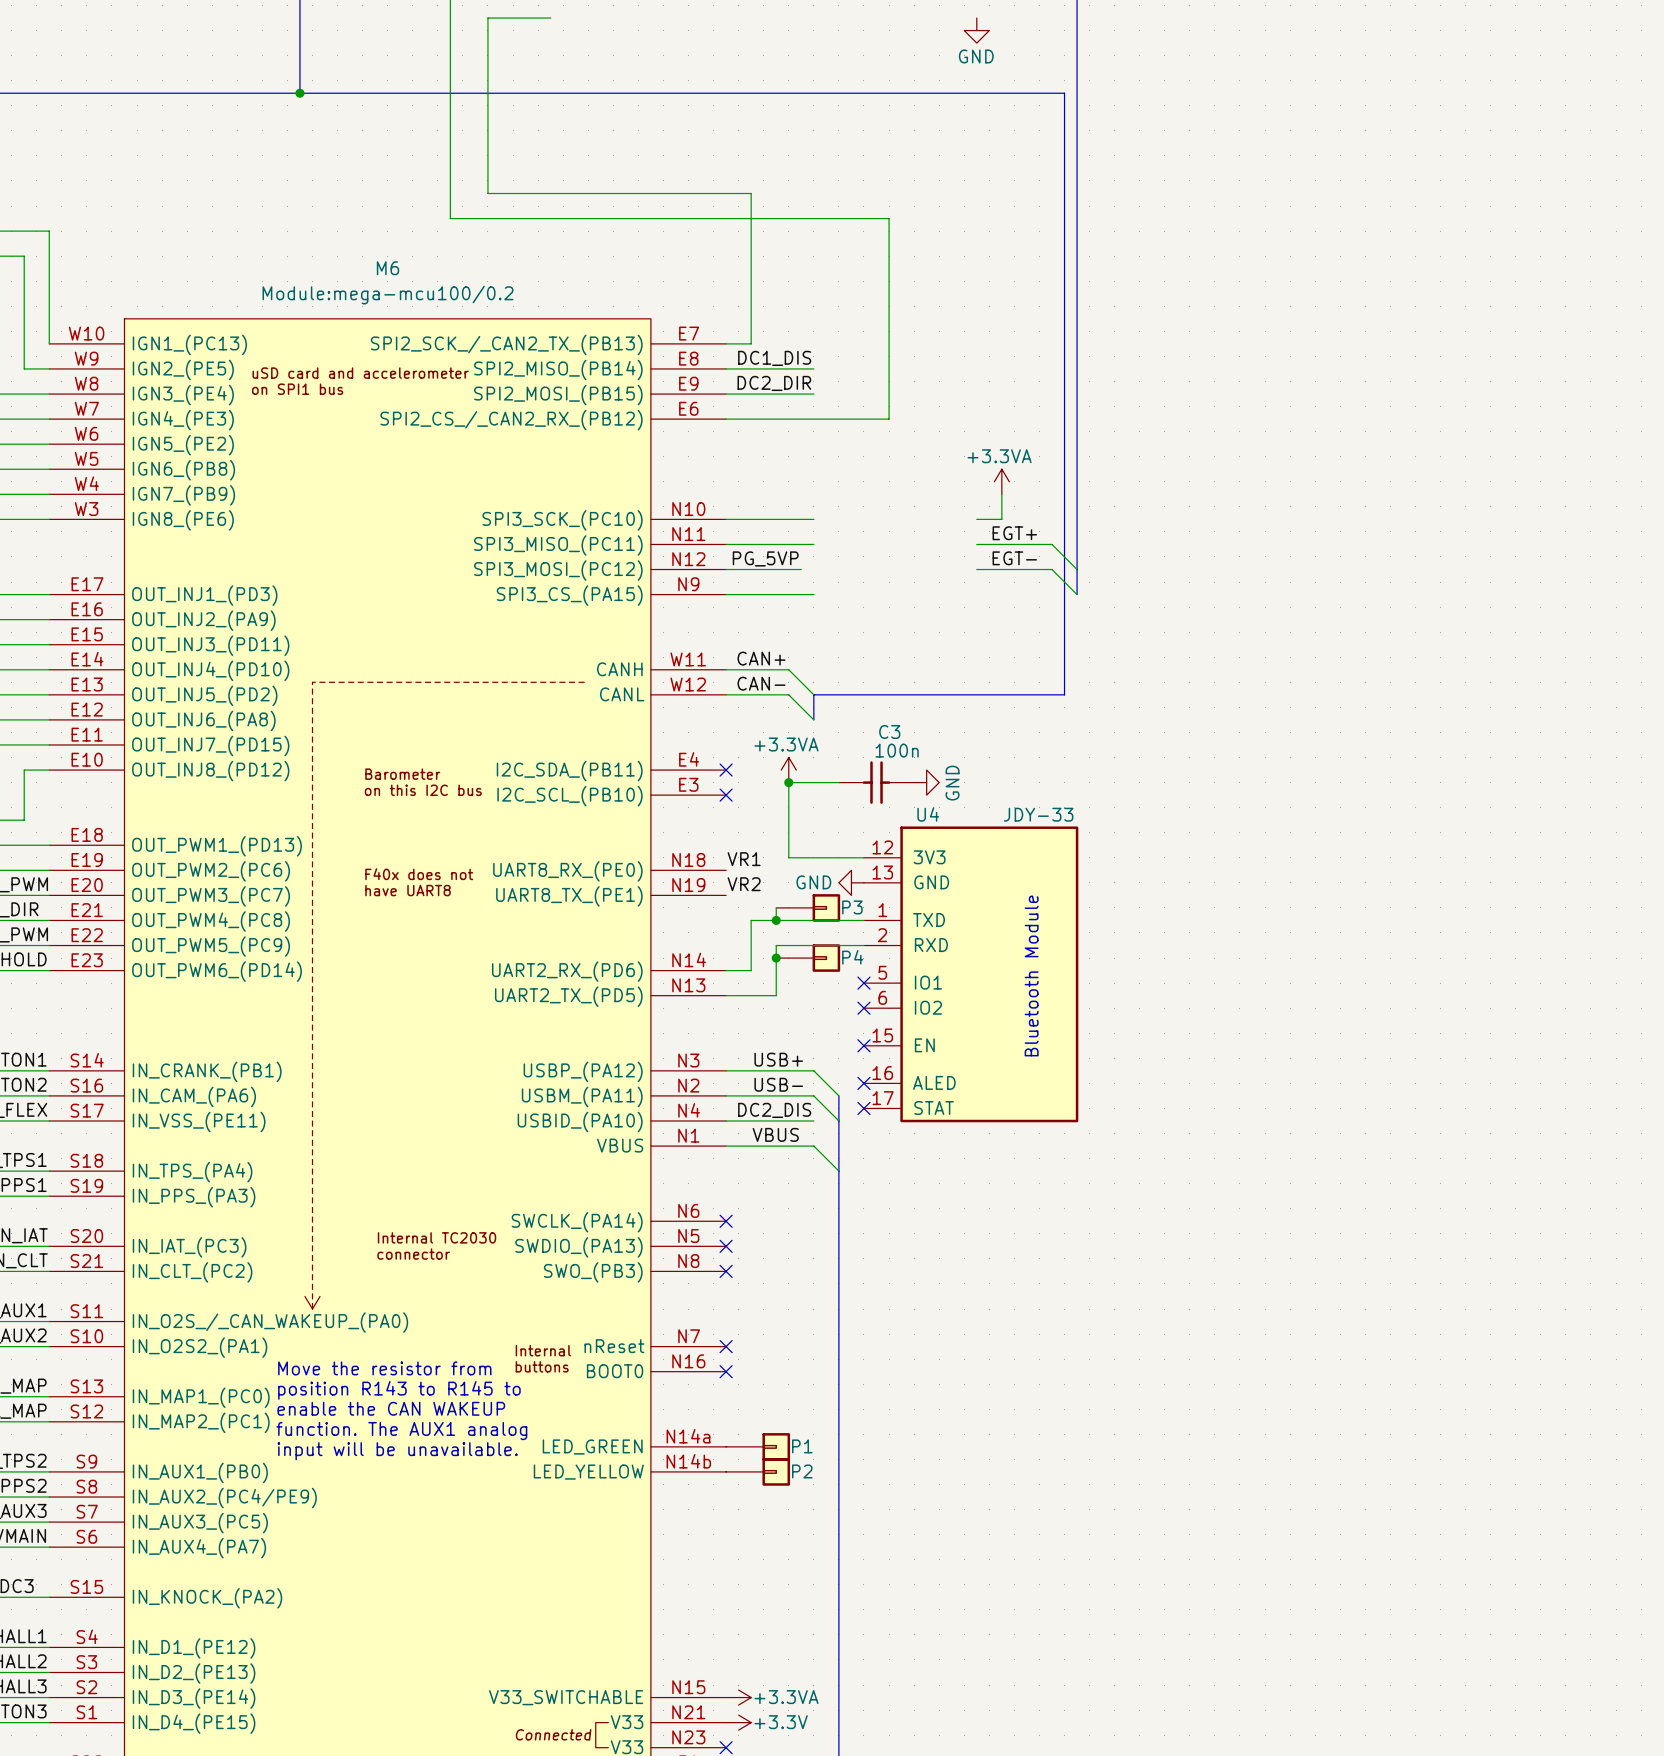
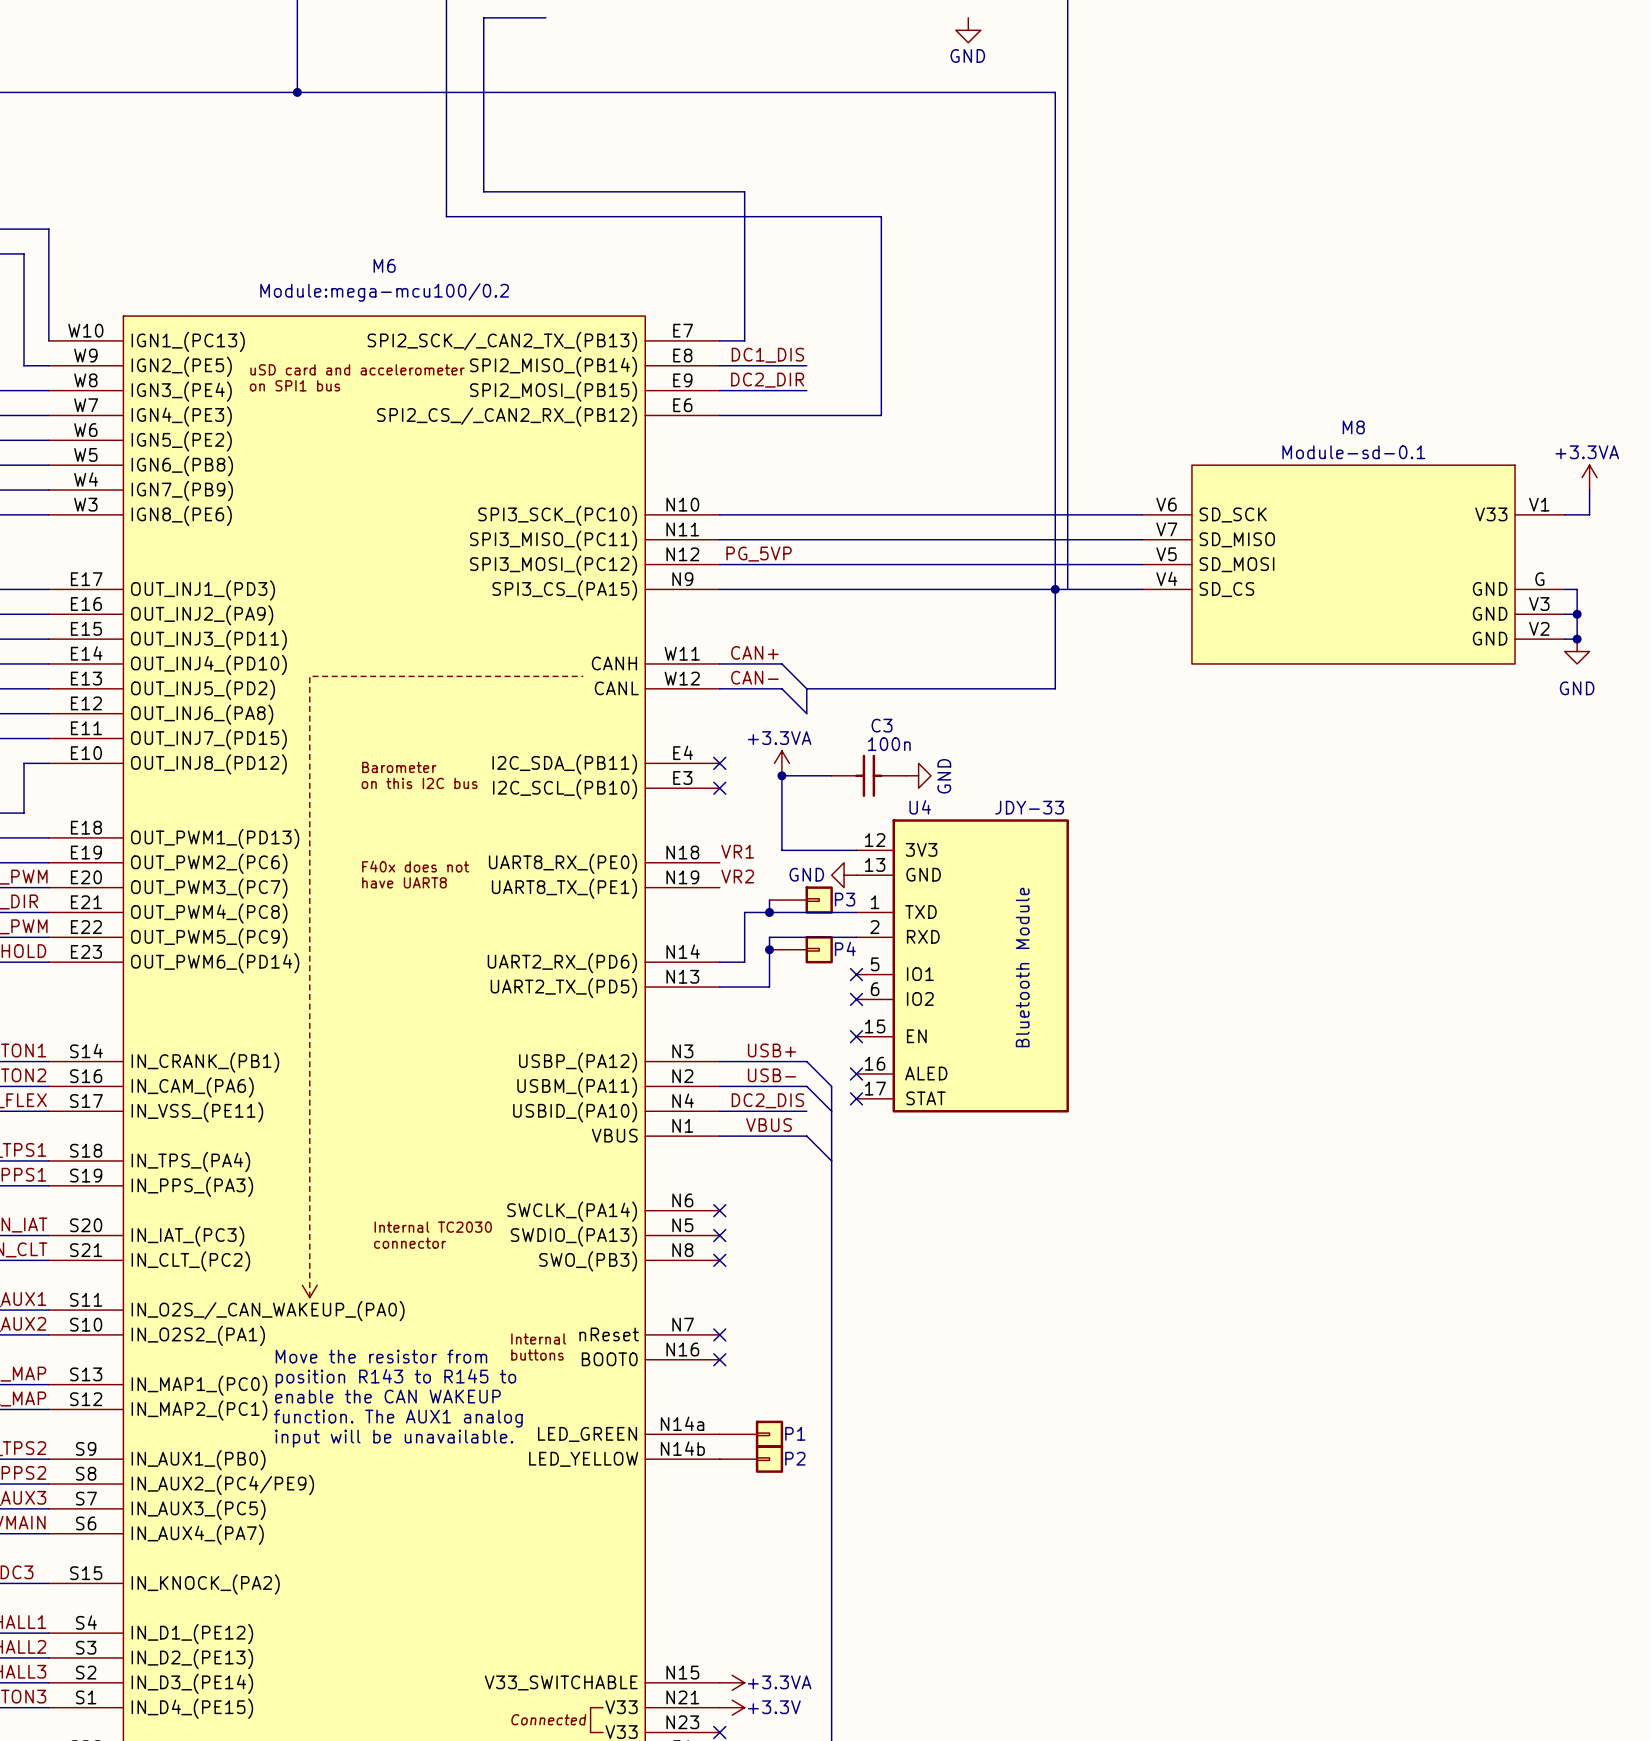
power symbol: +3.3VA (1001, 481) -> none
power symbol: none -> +3.3VA (1589, 477)
wire: (1001, 494) (1001, 519) -> (1142, 514) (993, 514)
wire: none -> (1589, 490) (1589, 514) (1564, 514)
wire: none -> (806, 514) (968, 514)
label: EGT+ (1014, 533) -> none
wire: none -> (806, 539) (968, 539)
wire: (1051, 544) (1077, 569) -> (1042, 539) (1142, 539)
label: EGT- (1014, 558) -> none
wire: none -> (794, 564) (968, 564)
wire: (1051, 569) (1077, 594) -> (1042, 564) (1142, 564)
M8: none -> Module-sd-0.1 (1353, 564)
wire: none -> (806, 589) (1142, 589)
junction: none -> (1055, 589)
wire: none -> (1564, 589) (1577, 589) (1577, 639) (1564, 639)
wire: none -> (1564, 614) (1577, 614)
junction: none -> (1577, 614)
junction: none -> (1577, 639)
power symbol: none -> GND (1577, 651)

